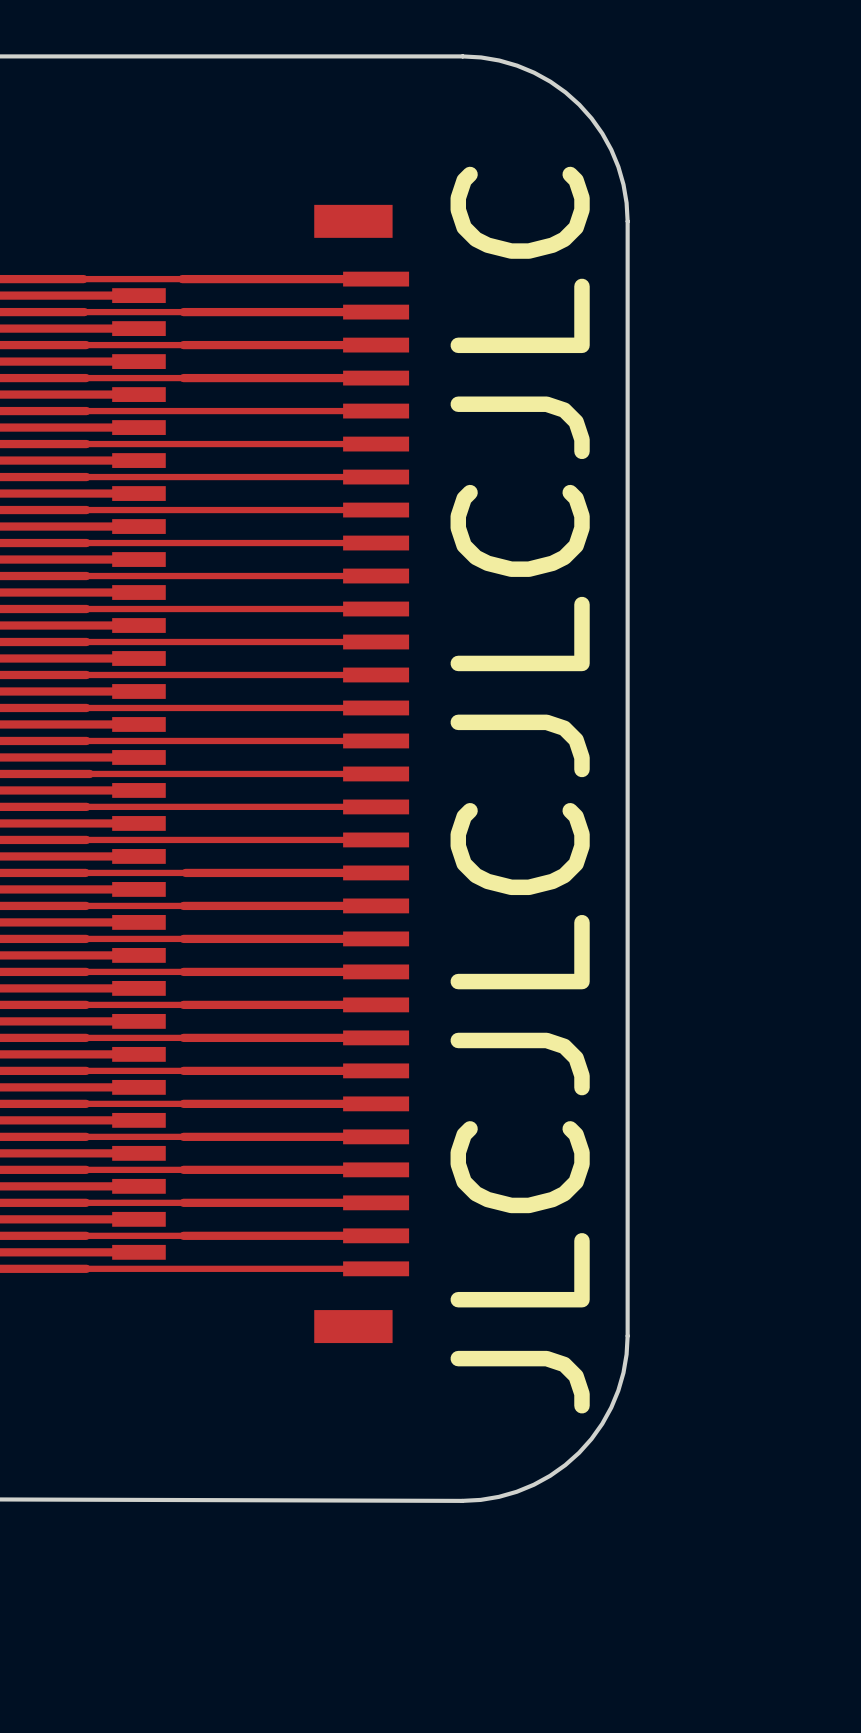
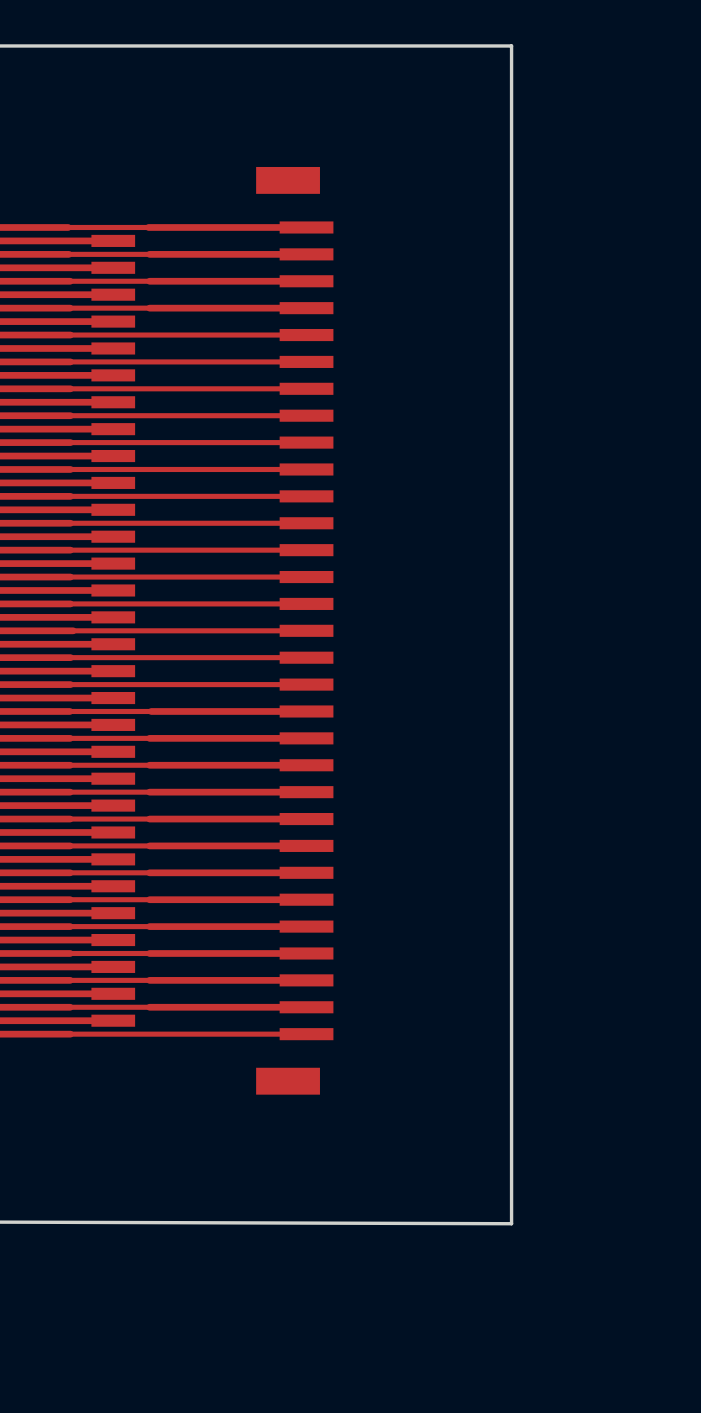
board edge: (462, 56) (481, 57) (517, 65) (550, 81) (579, 104) (602, 133) (618, 166) (626, 202) (627, 221) -> (377, 45) (511, 45) (511, 180)
text: JLCJLCJLCJLC (520, 790) -> none
board edge: (627, 1335) (623, 1372) (618, 1390) (602, 1423) (579, 1452) (550, 1475) (516, 1491) (480, 1499) (462, 1500) -> (511, 1088) (511, 1223) (376, 1223)

